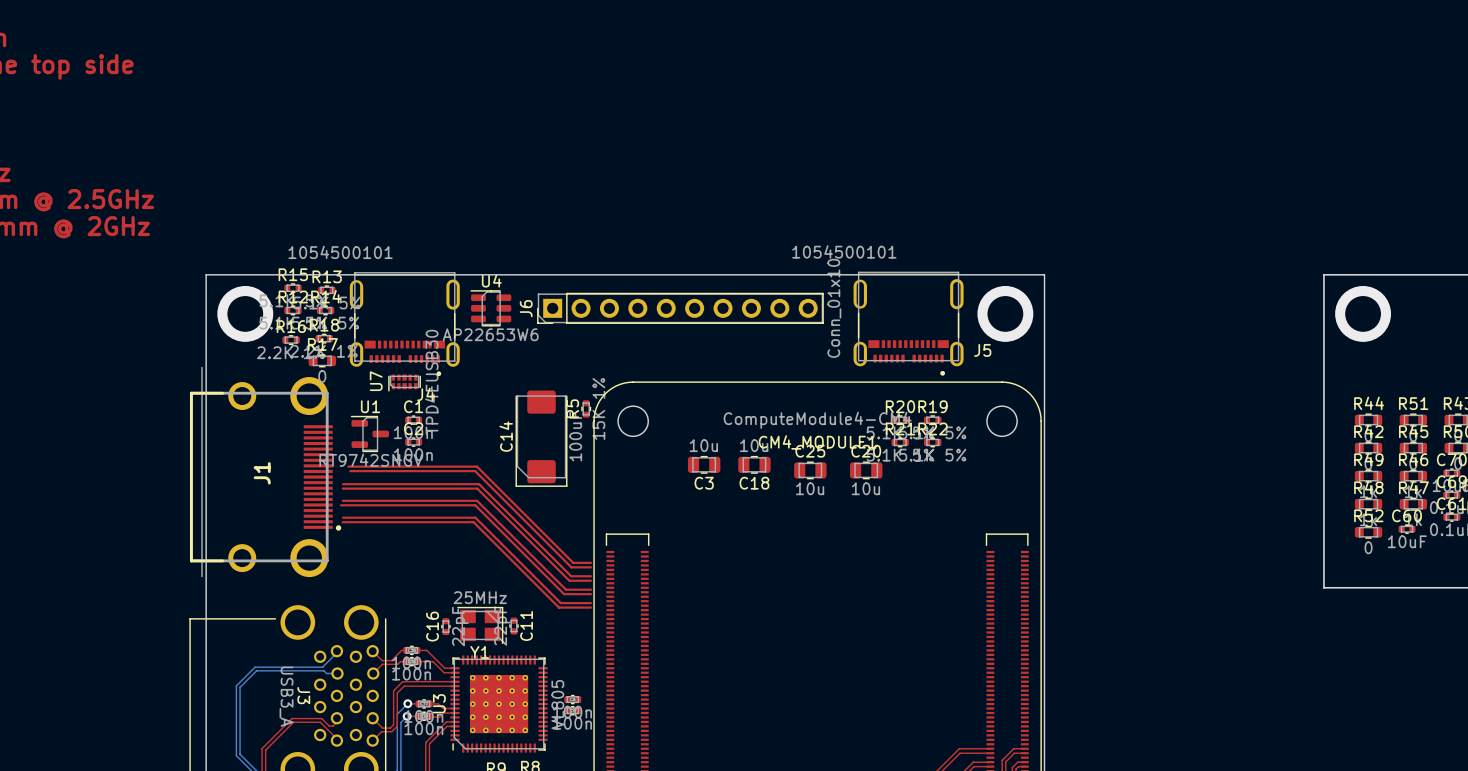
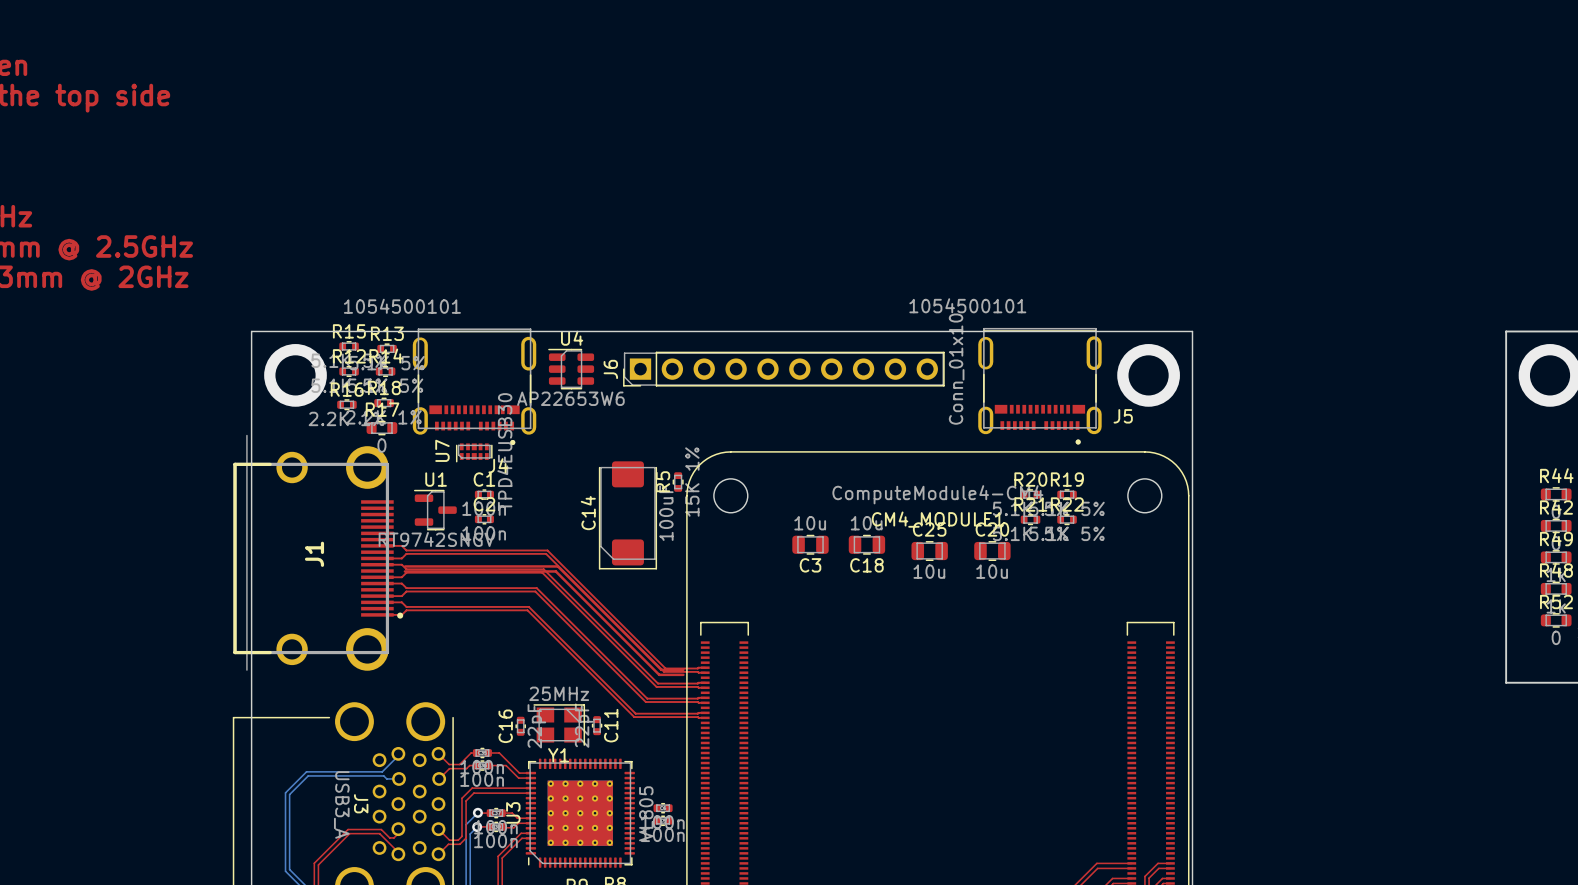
top track: none -> (377, 545) (401, 545) (406, 550) (547, 550) (665, 668) (705, 667)
top track: (348, 466) (477, 466) (573, 562) (590, 562) -> none
top track: (350, 471) (475, 471) (571, 567) (590, 567) -> none
top track: none -> (377, 558) (401, 558) (406, 553) (546, 553) (664, 671) (705, 672)
top track: none -> (377, 564) (401, 564) (406, 569) (543, 569) (658, 683) (705, 682)
top track: none -> (377, 577) (401, 577) (406, 572) (542, 572) (656, 686) (705, 687)
top track: none -> (377, 583) (401, 583) (406, 588) (536, 588) (647, 698) (705, 697)
top track: (342, 500) (477, 500) (565, 589) (590, 589) -> none
top track: (341, 505) (475, 505) (564, 594) (590, 594) -> none
top track: none -> (377, 596) (401, 596) (406, 591) (535, 591) (645, 702) (705, 702)
top track: none -> (377, 602) (401, 602) (406, 606) (528, 606) (635, 713) (705, 712)
top track: (342, 517) (475, 517) (560, 603) (590, 603) -> none
top track: (342, 522) (473, 522) (558, 607) (590, 607) -> none
top track: none -> (377, 614) (401, 614) (406, 610) (527, 610) (634, 717) (705, 717)

